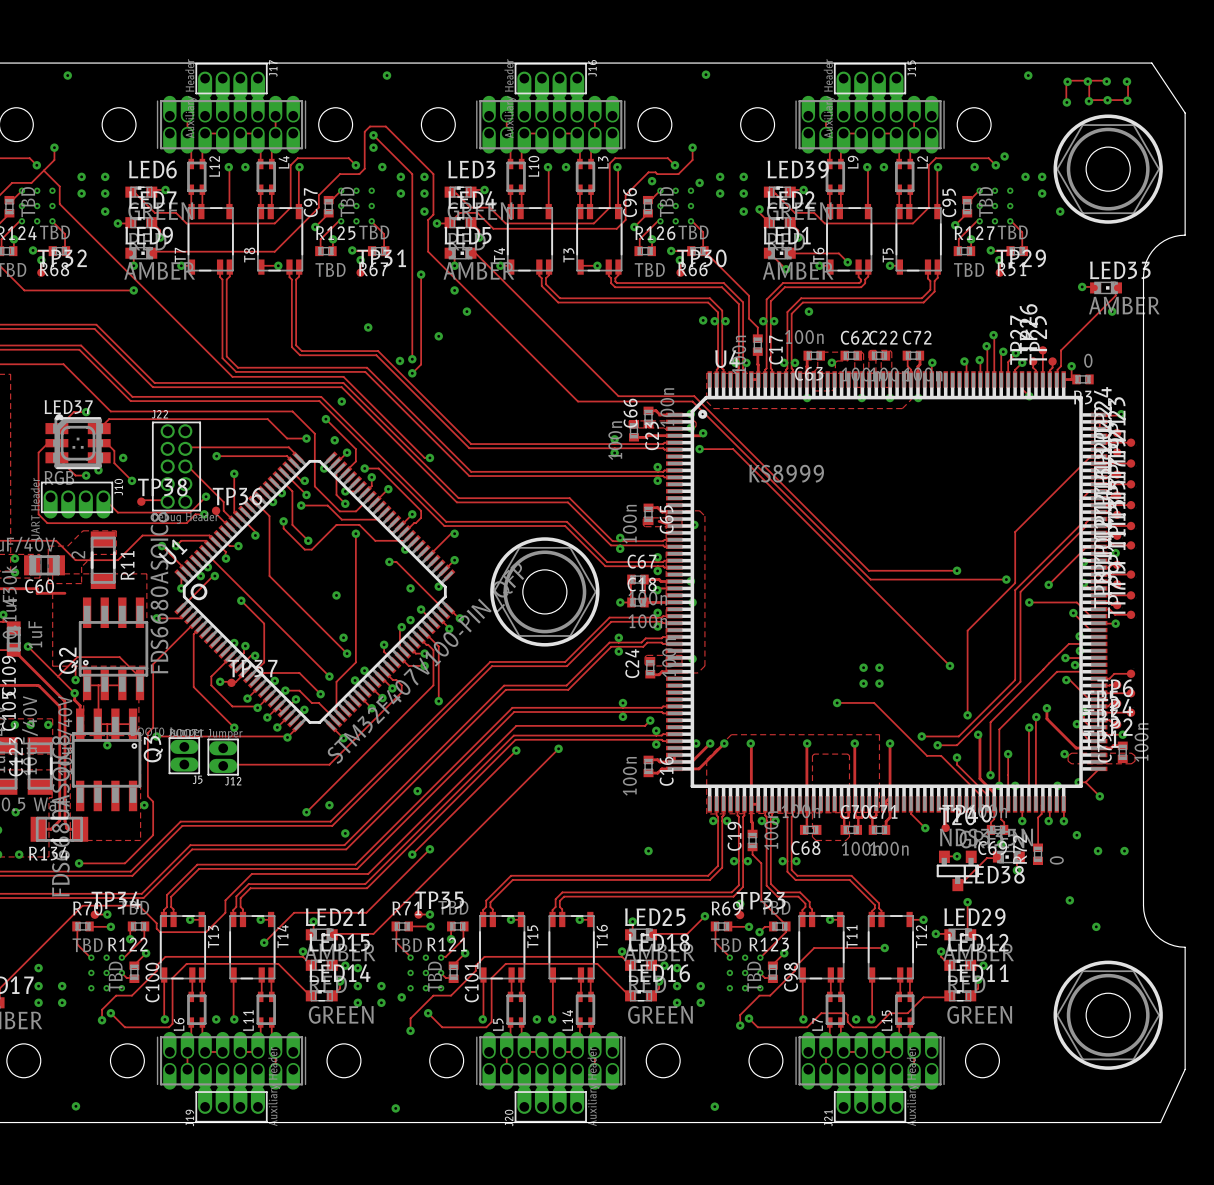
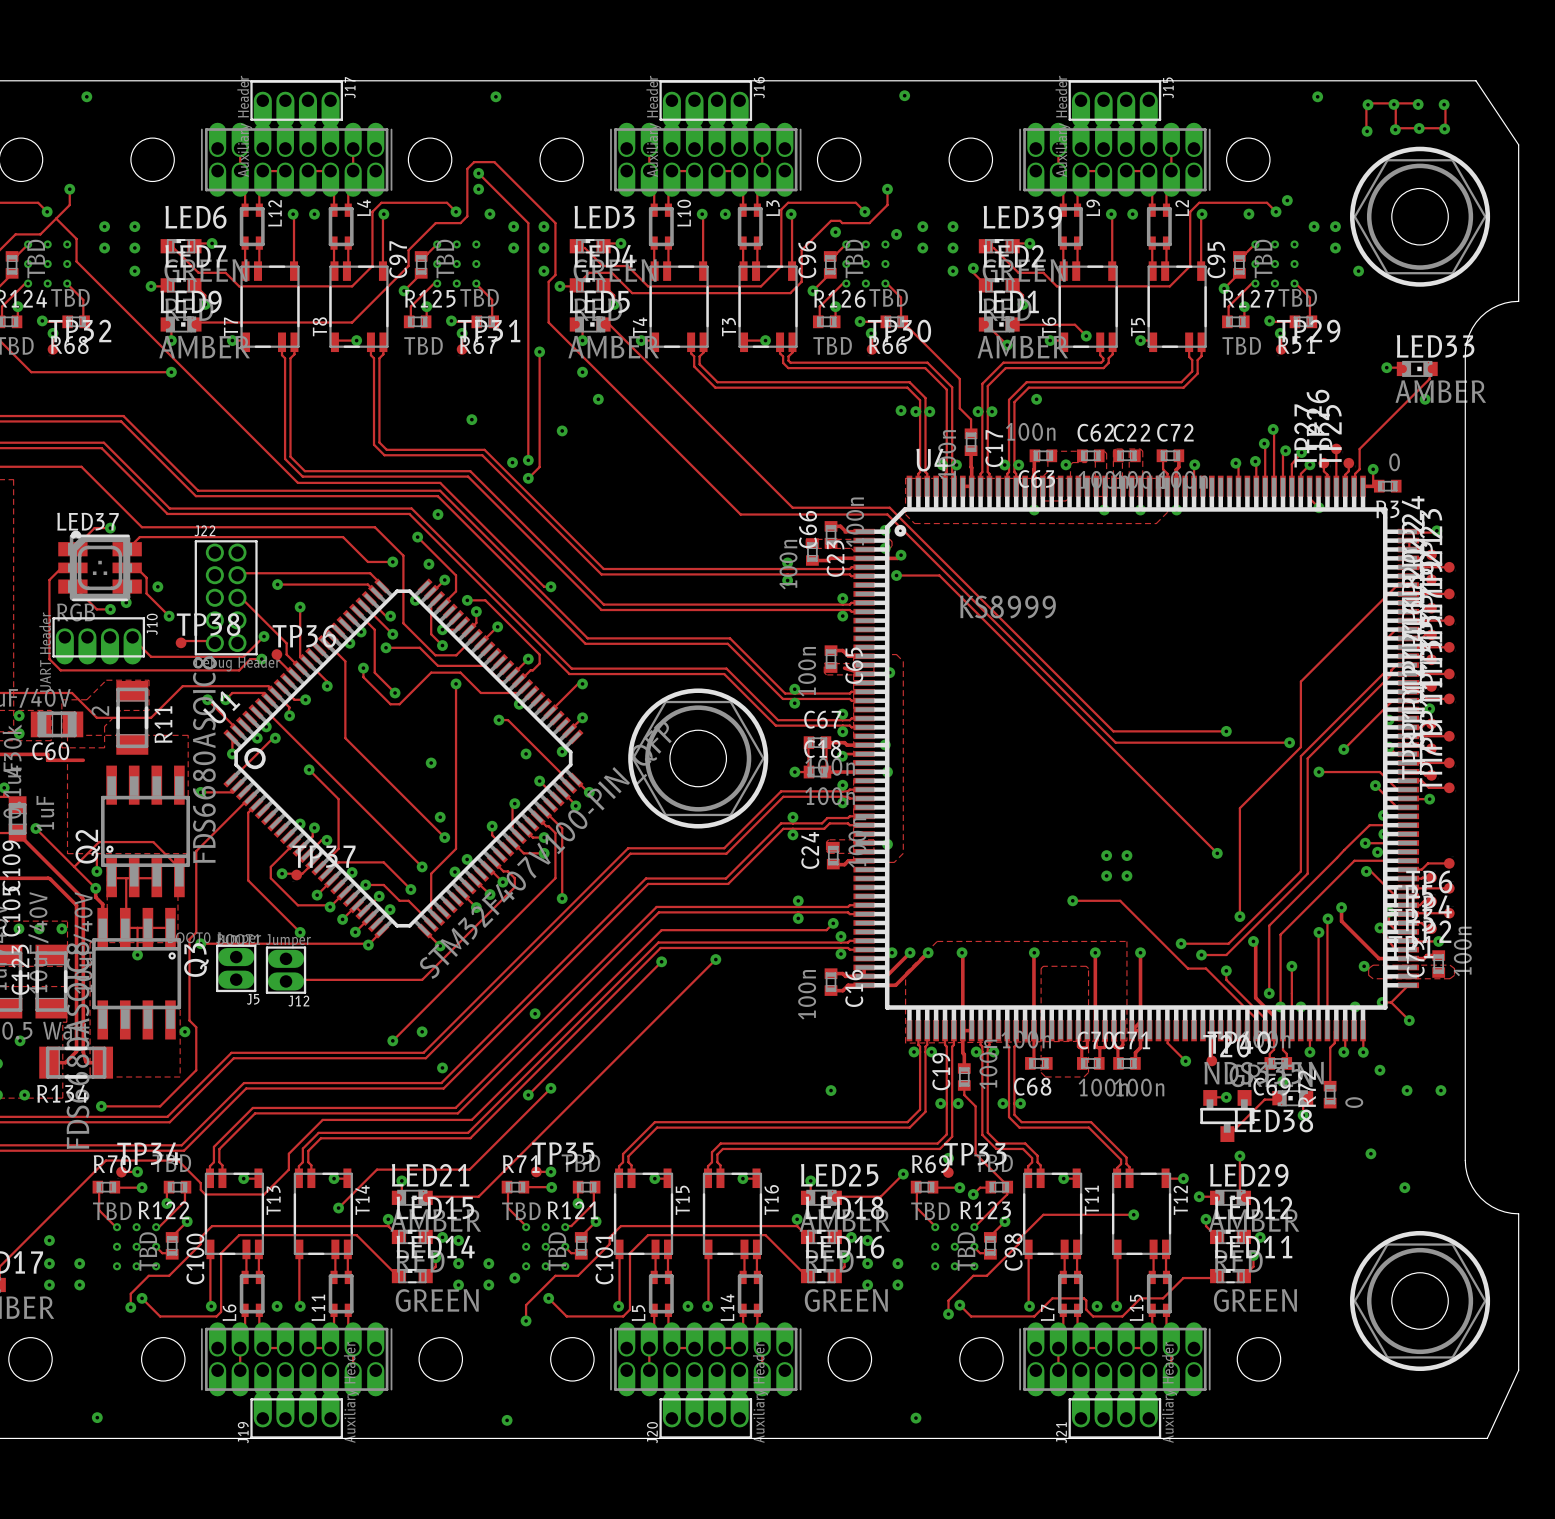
via: (410, 620) -> none

